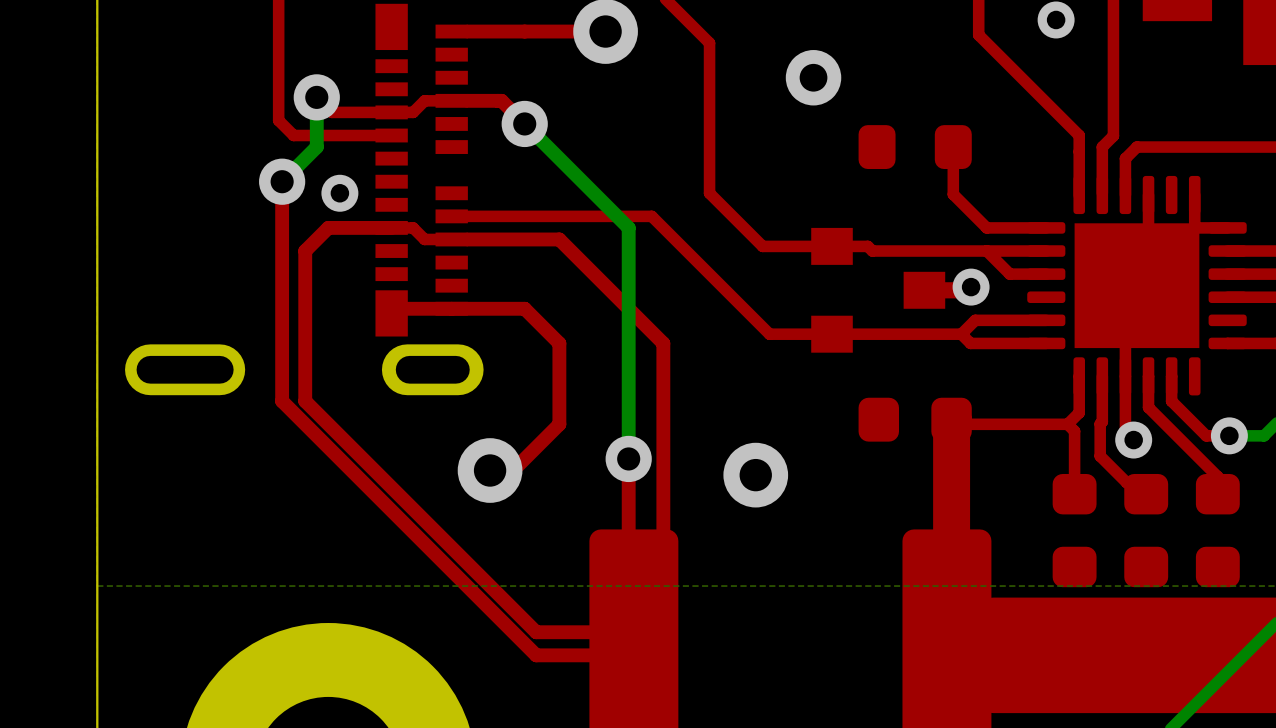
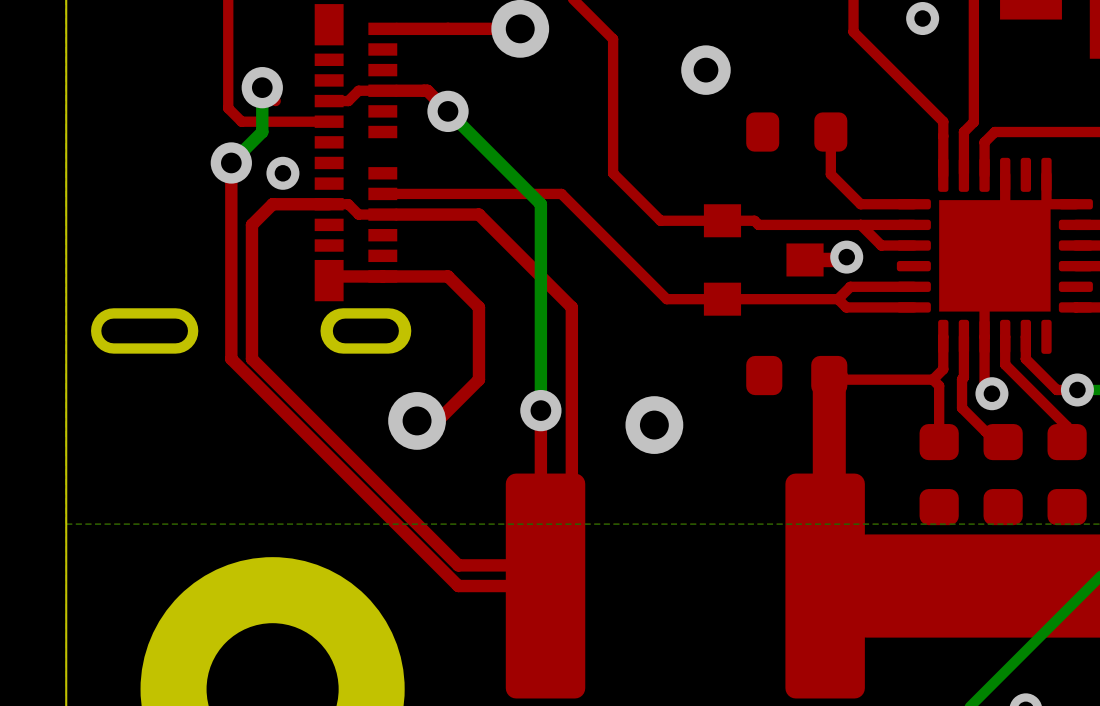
top track: (391, 112) (331, 112) -> none

